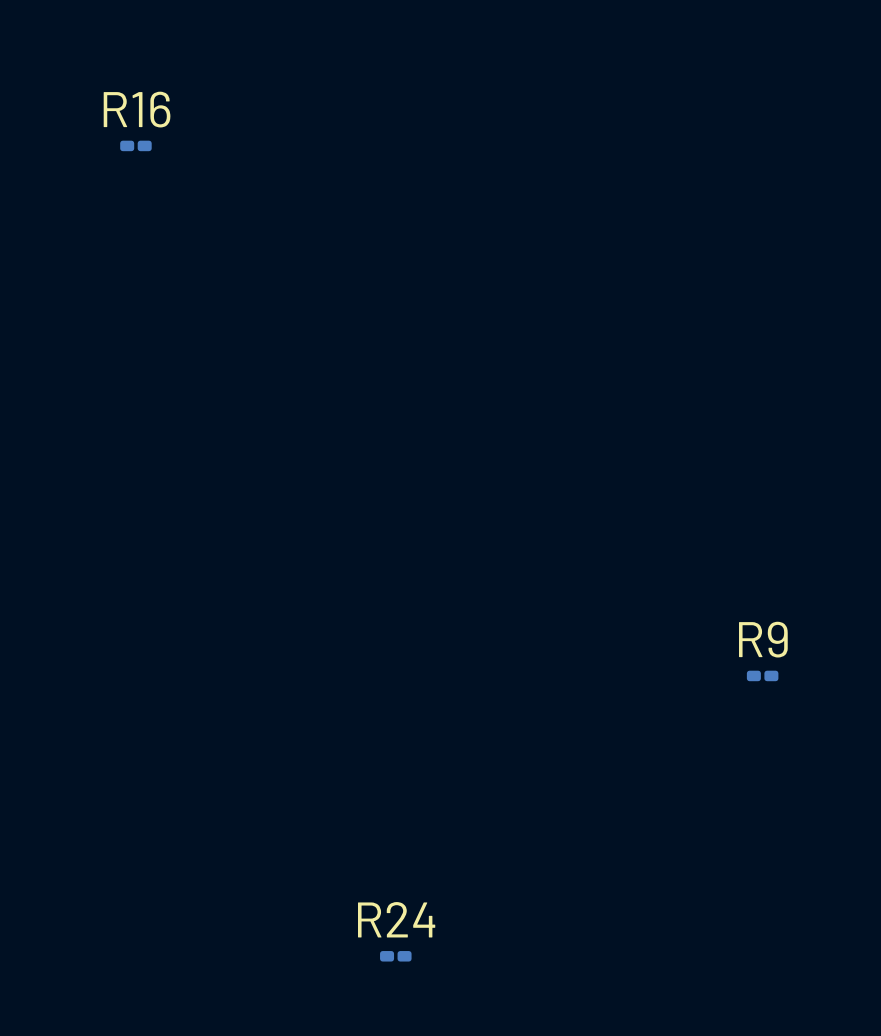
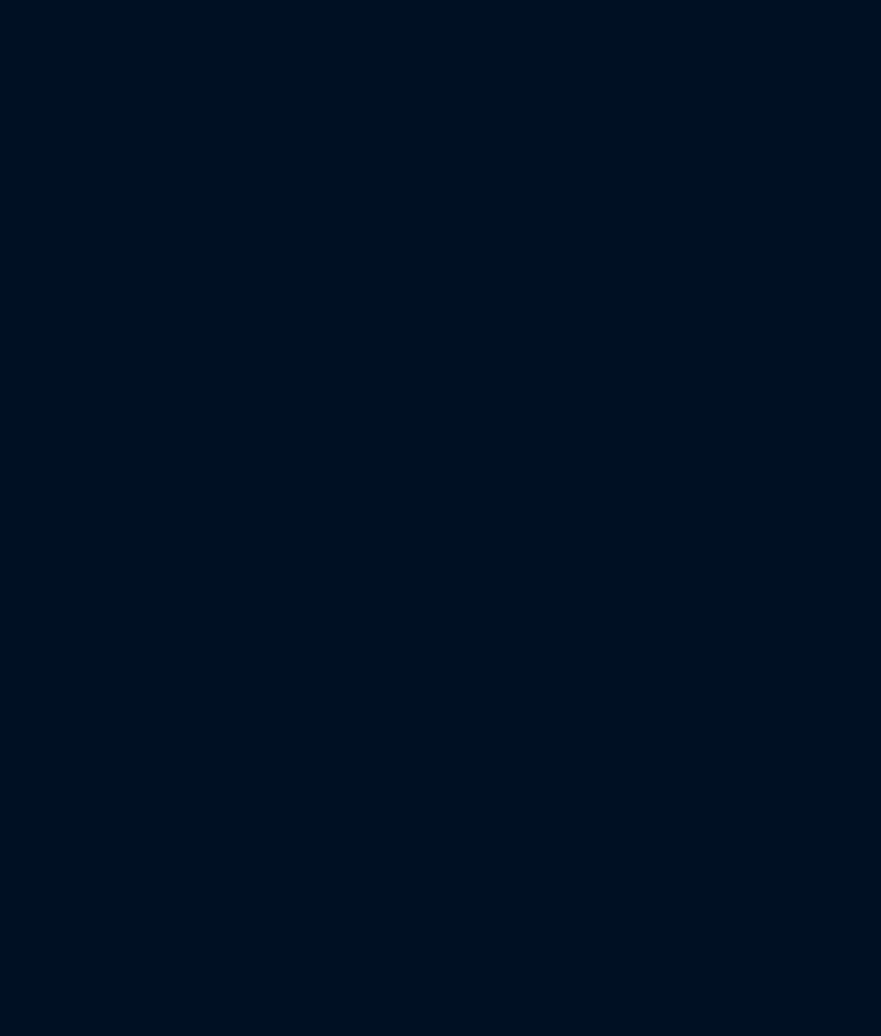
R16: (135, 145) -> none
R9: (762, 675) -> none
R24: (395, 956) -> none

